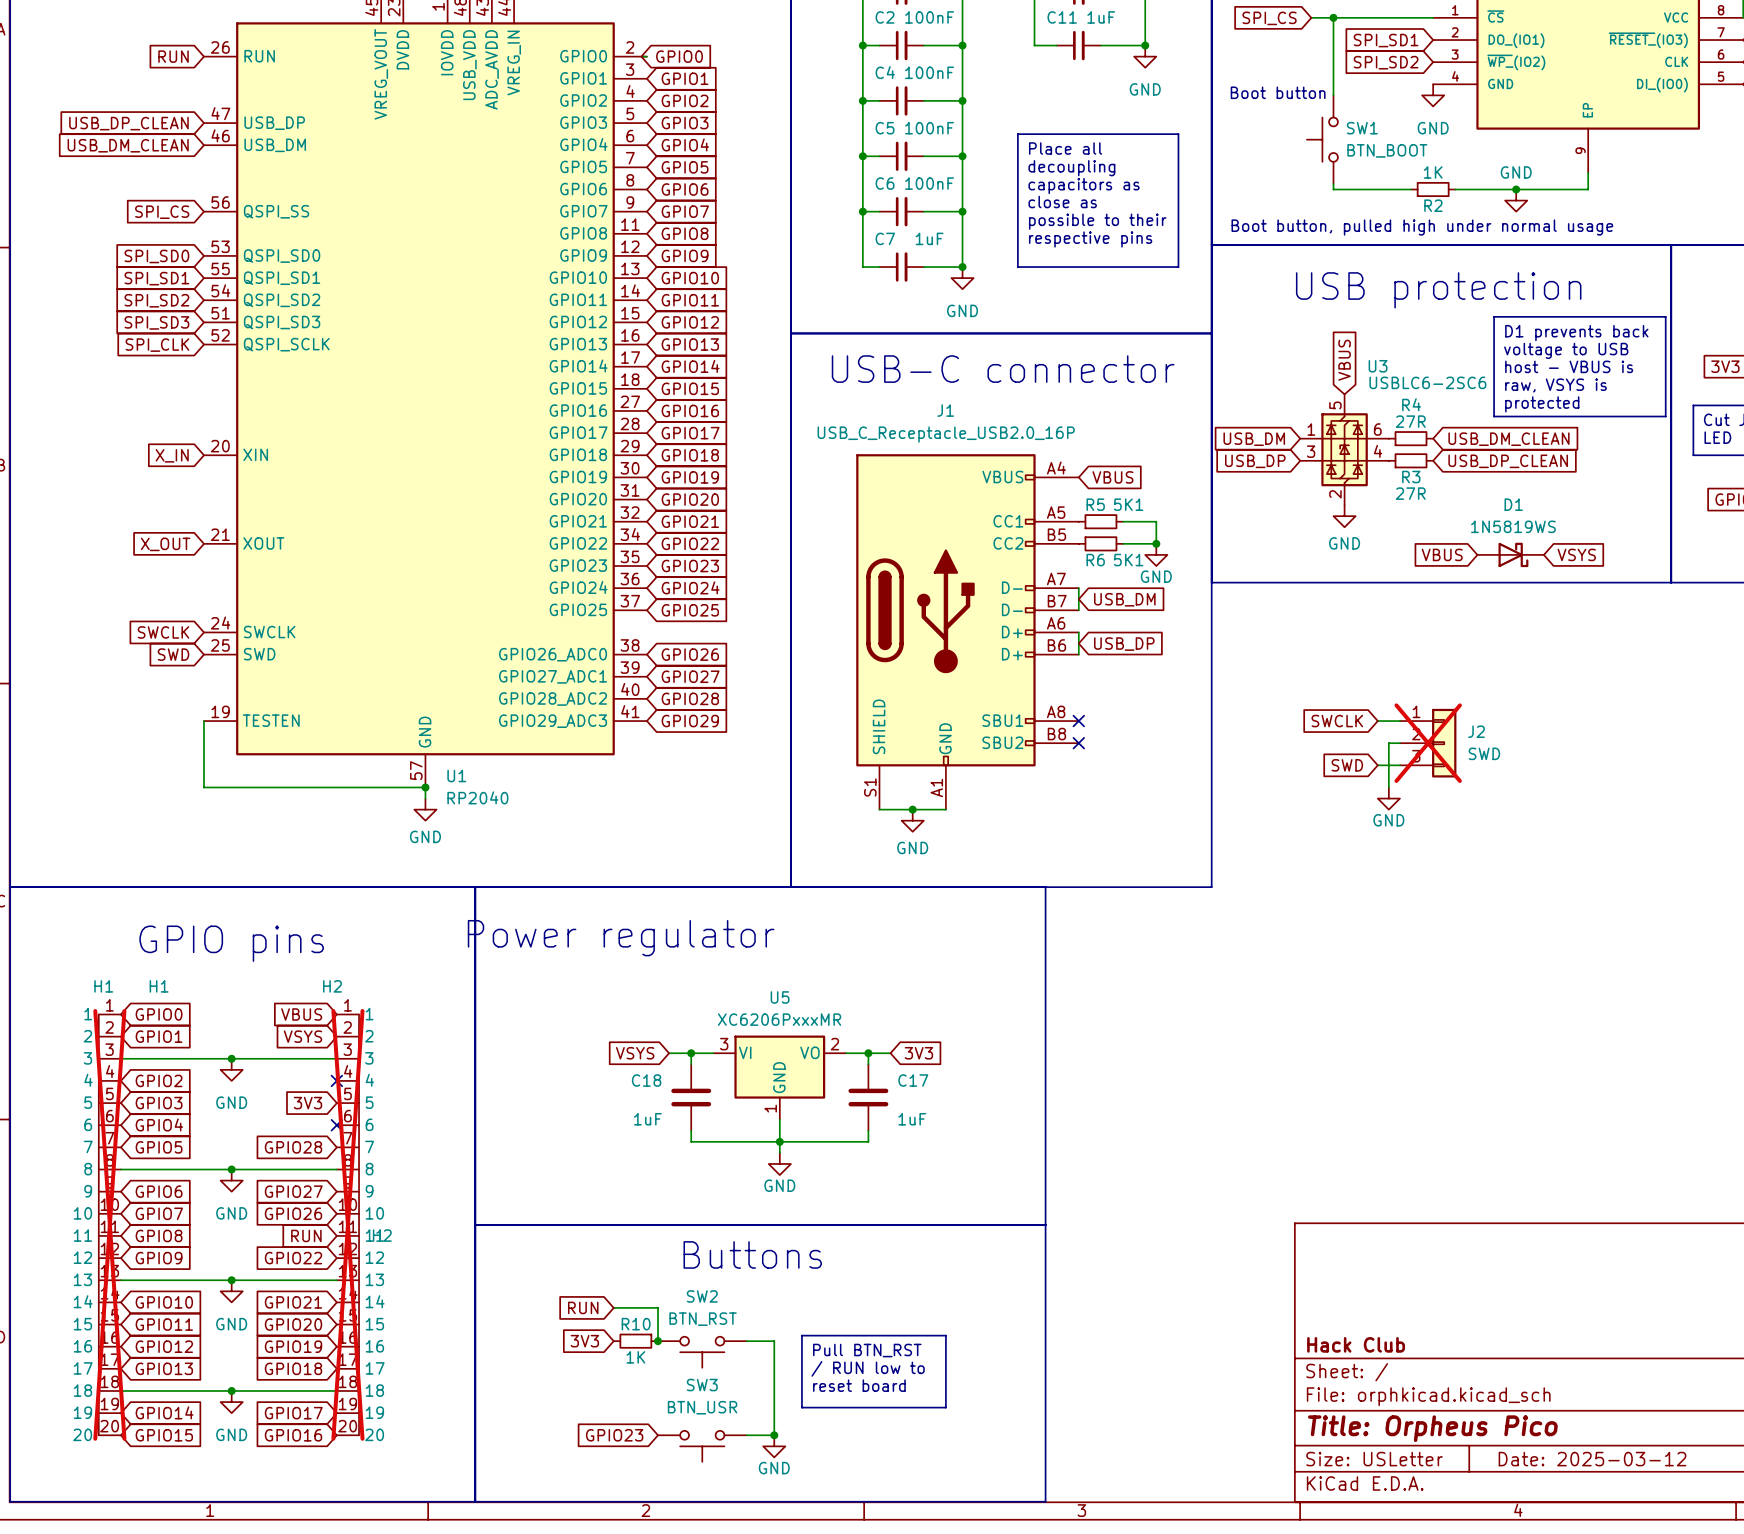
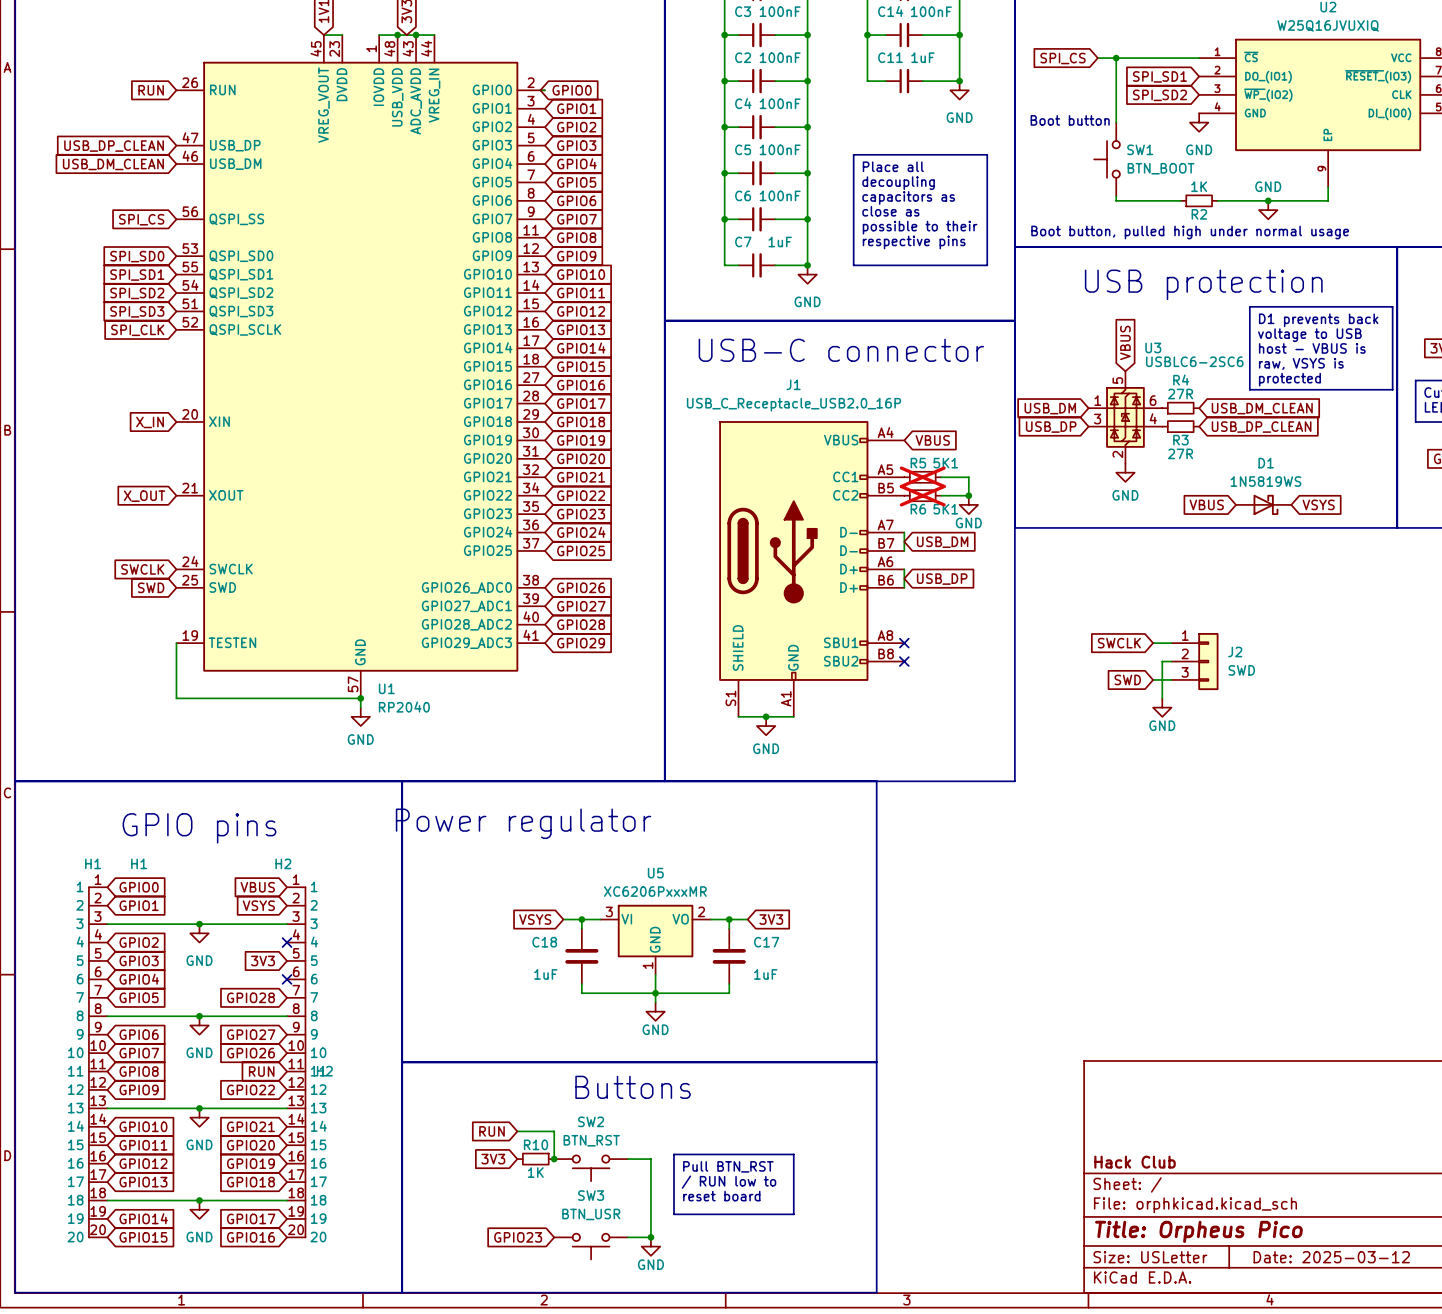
R5 do-not-place cross: none -> (922, 477)
R6 do-not-place cross: none -> (922, 495)
J2 do-not-place cross: (1428, 743) -> none
H1 do-not-place cross: (109, 1224) -> none
H2 do-not-place cross: (347, 1224) -> none

